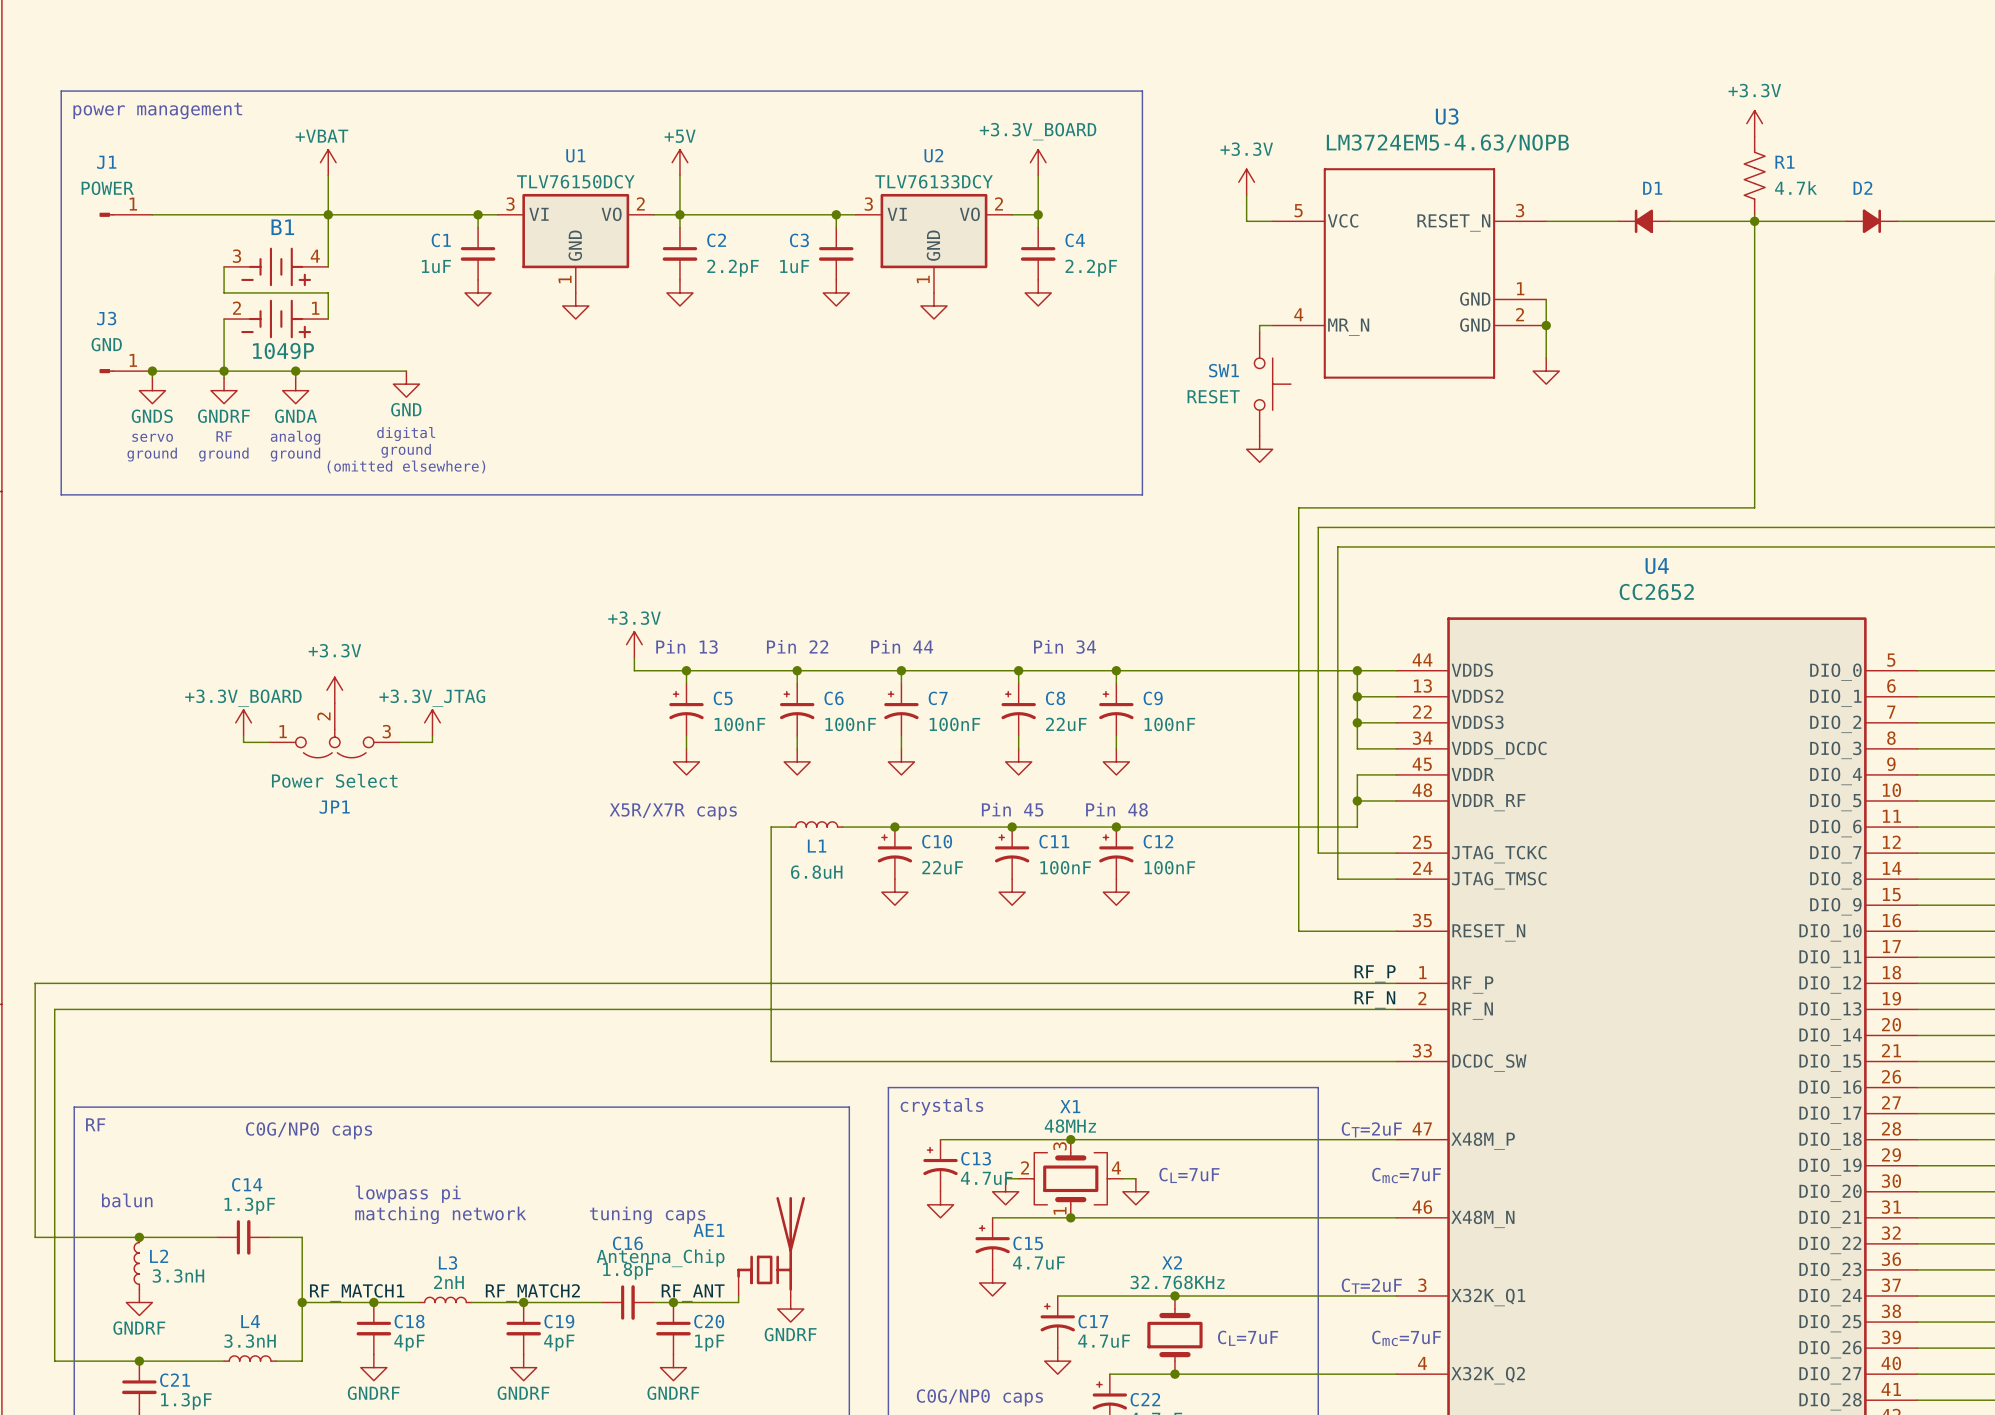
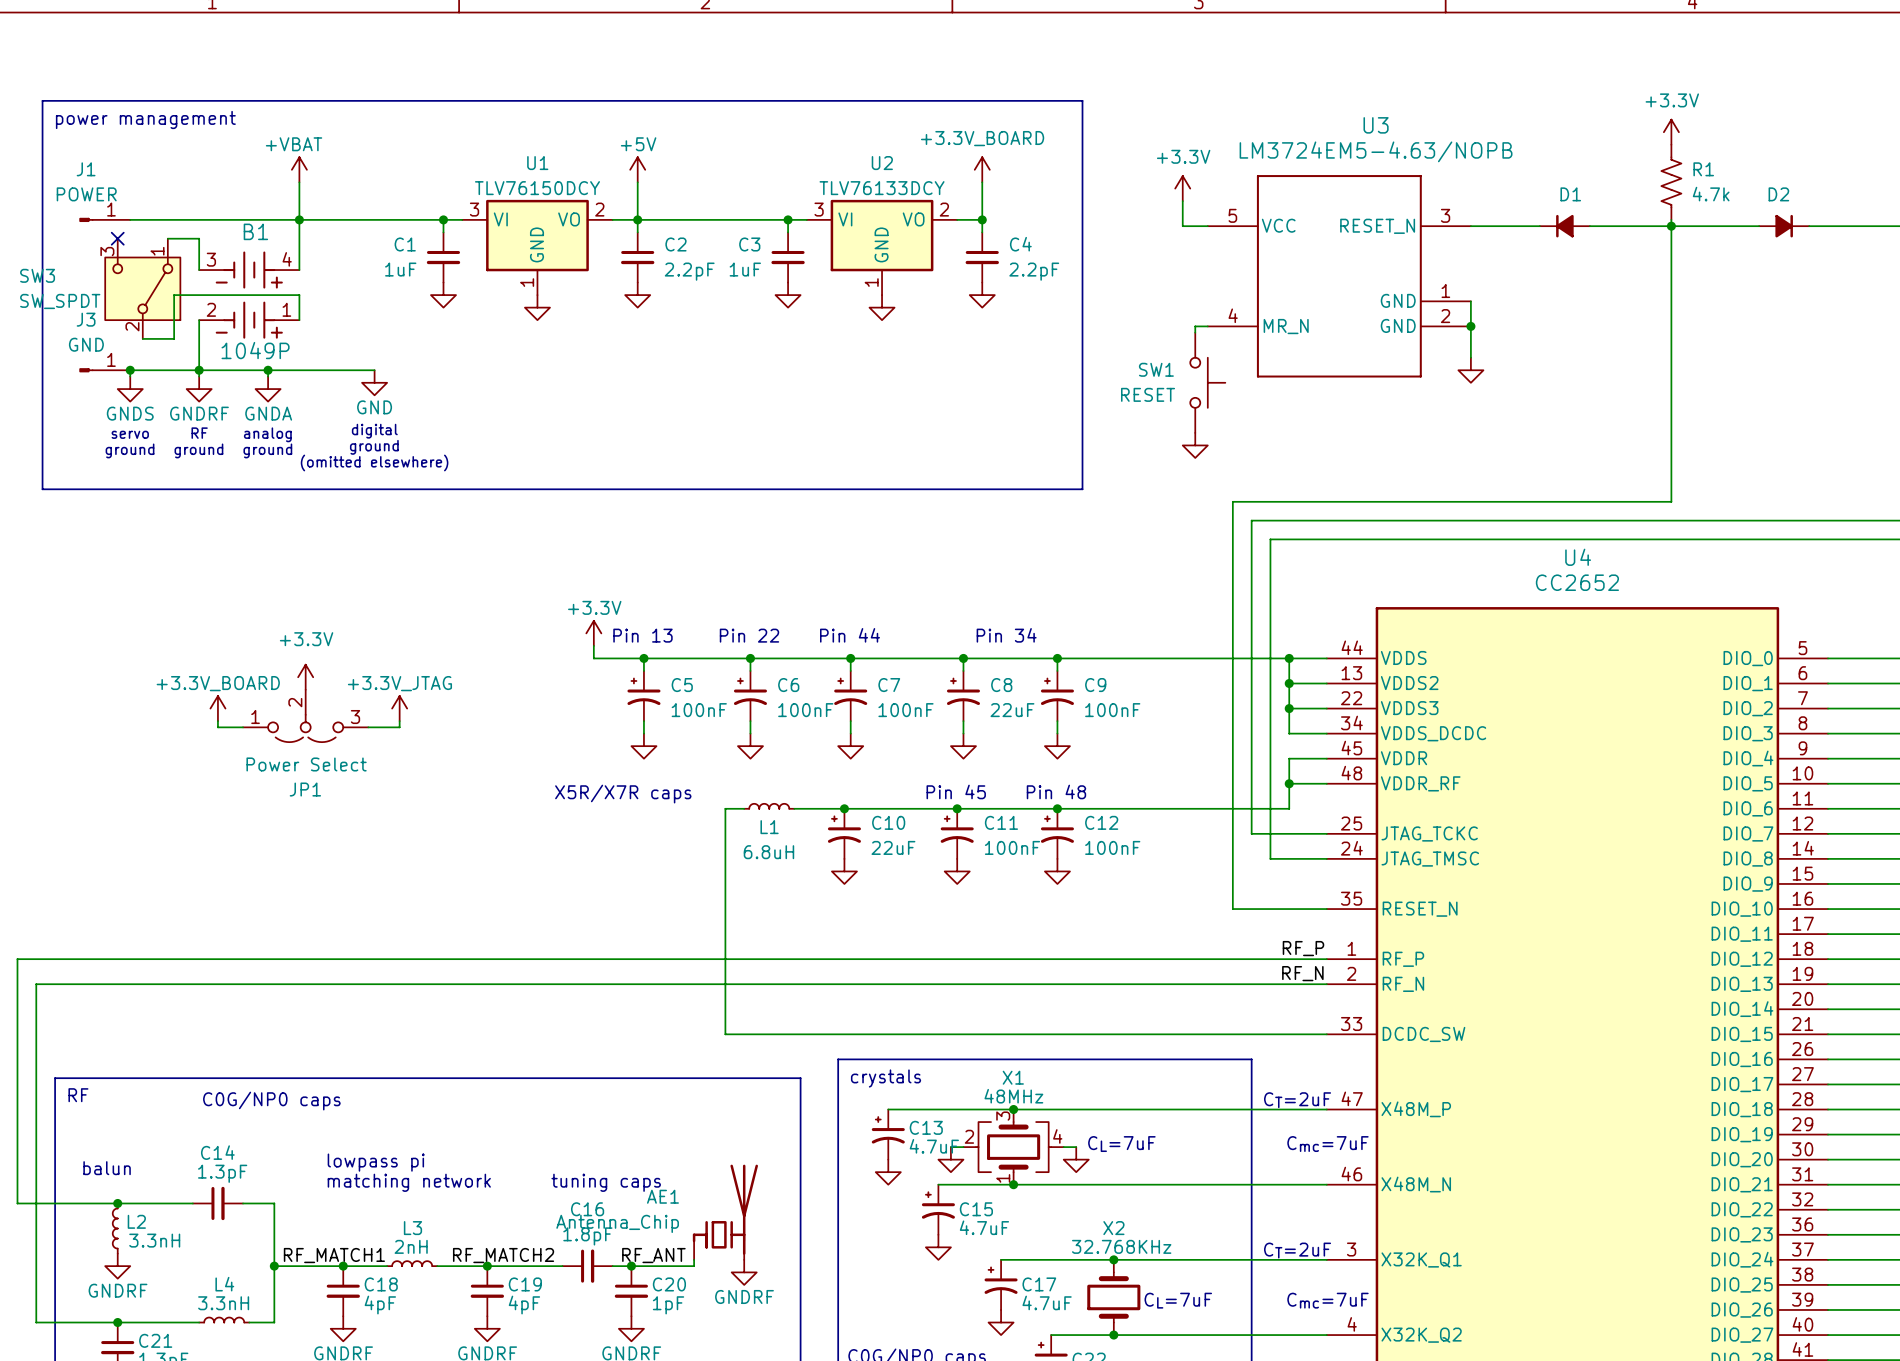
no-connect mark: none -> (117, 238)
wire: (224, 266) (224, 292) -> (199, 270) (199, 238) (167, 238)
SW3: none -> SW_SPDT (142, 288)
wire: none -> (199, 295) (174, 295) (174, 338) (142, 338)

